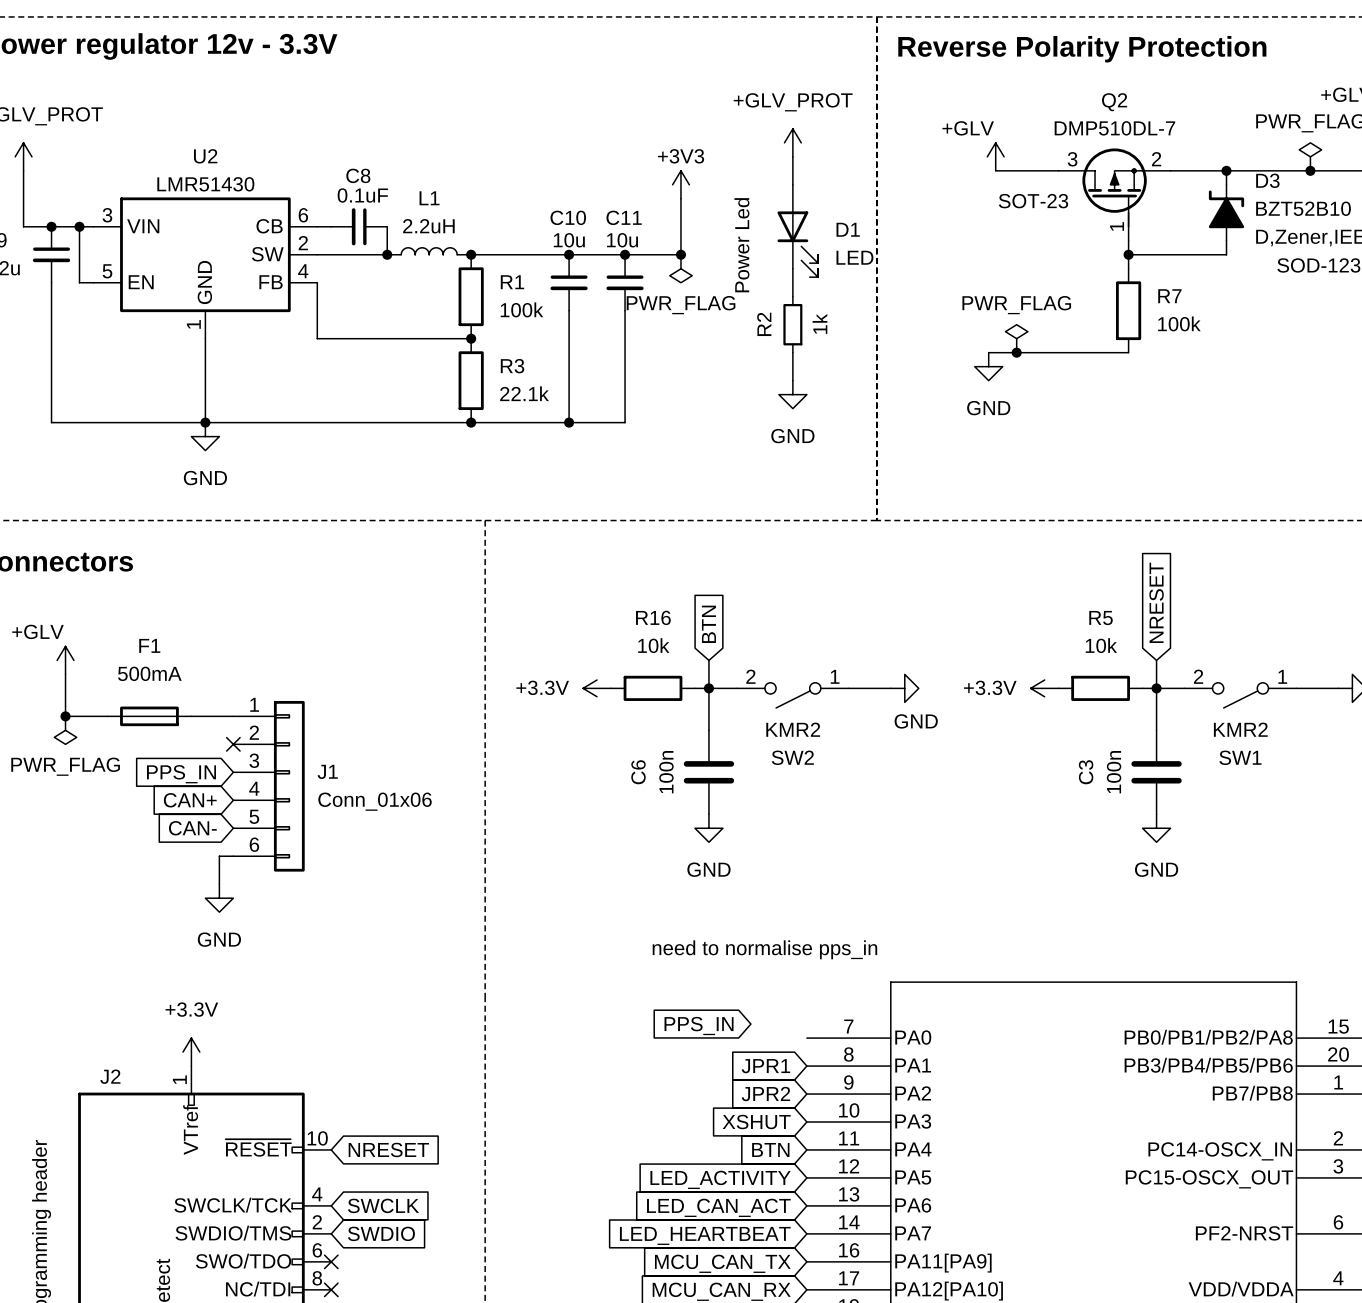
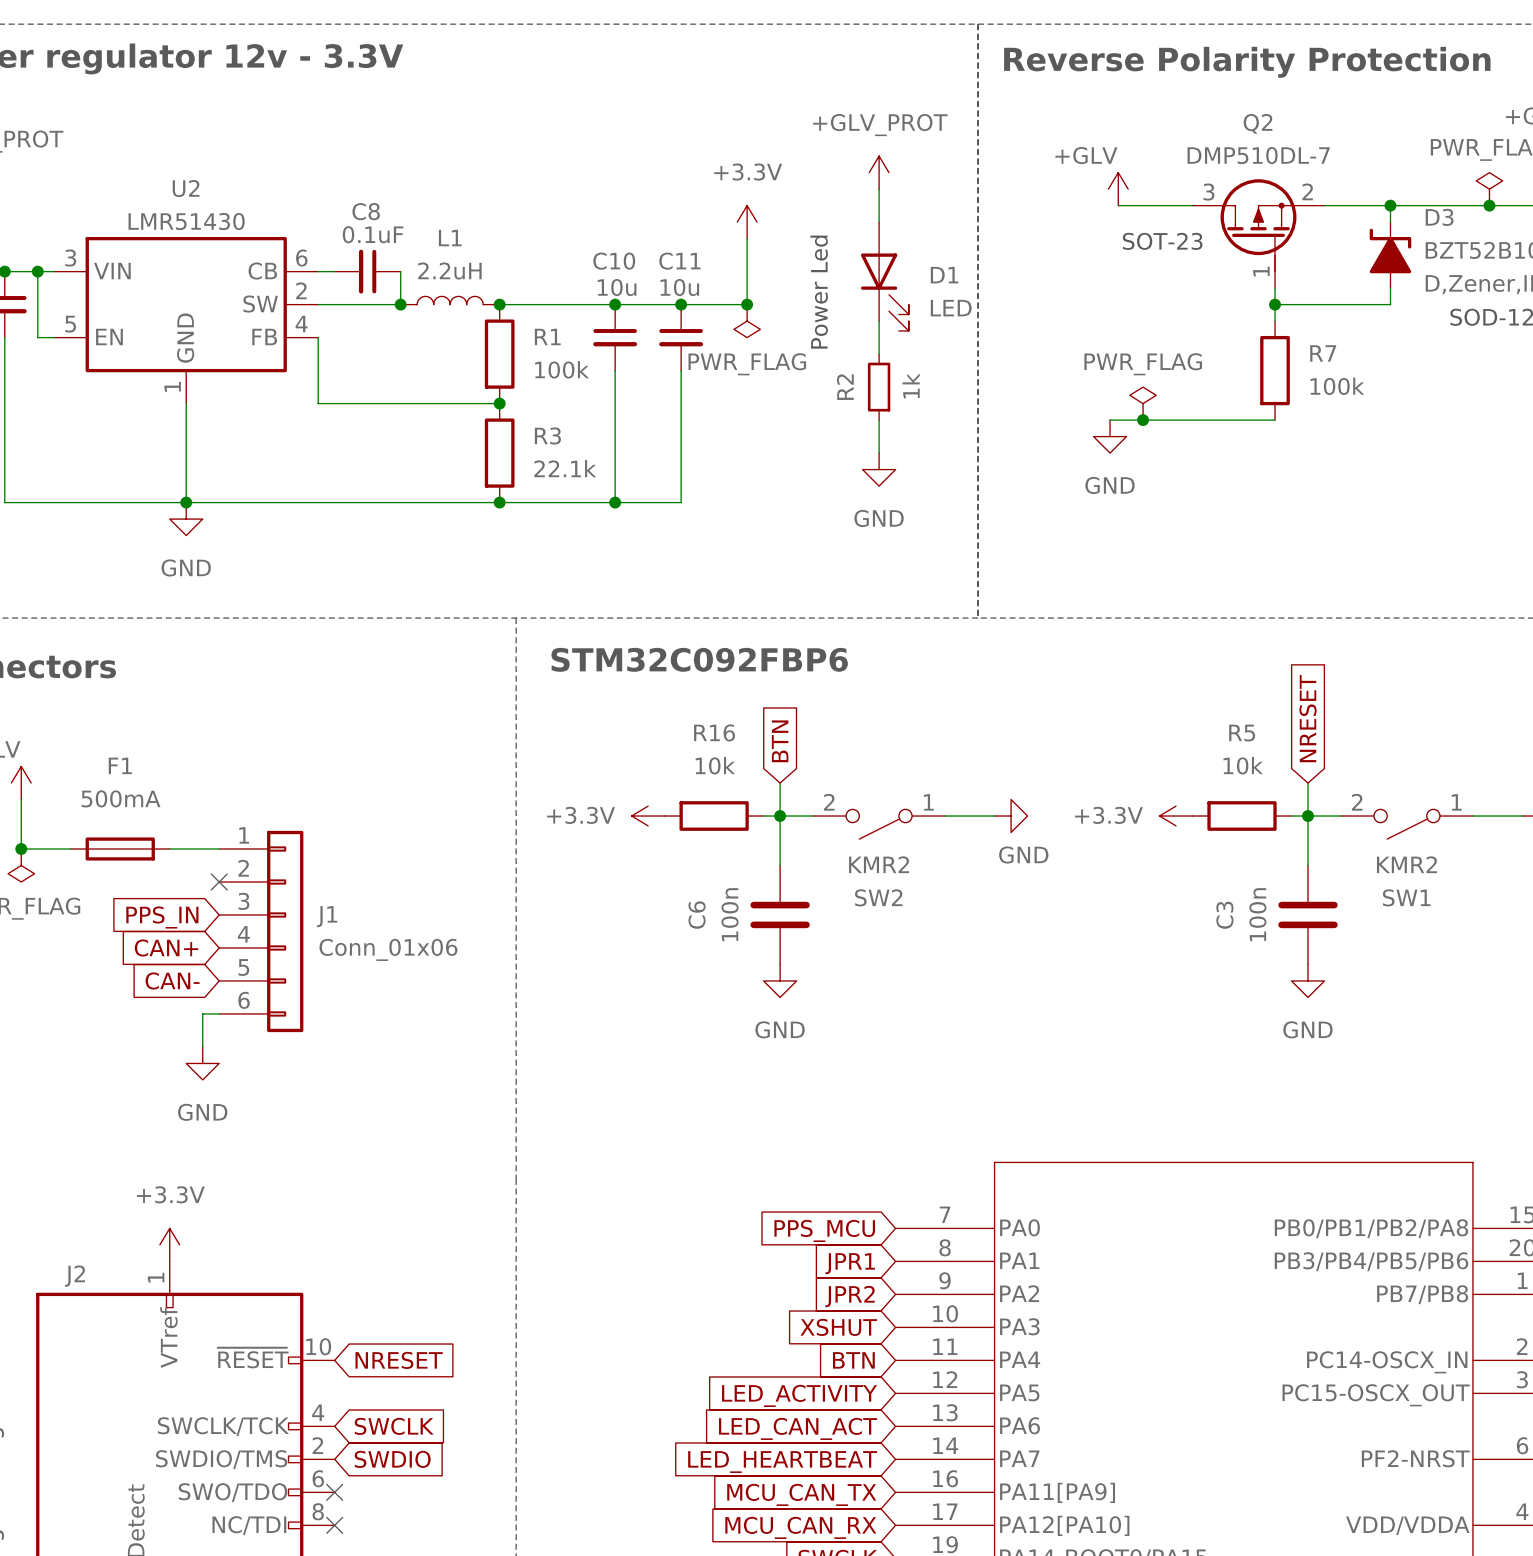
power symbol: +3V3 (680, 184) -> +3.3V (747, 222)
text: none -> STM32C092FBP6 (699, 659)
text: need to normalise pps_in (764, 949) -> none
global label: PPS_IN (699, 1026) -> PPS_MCU (824, 1230)

